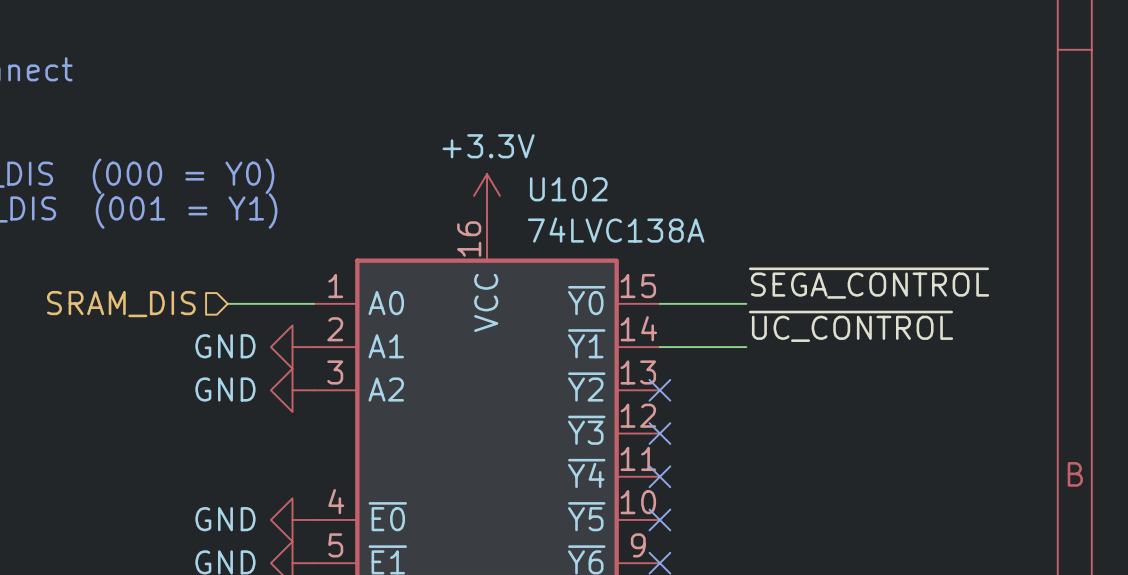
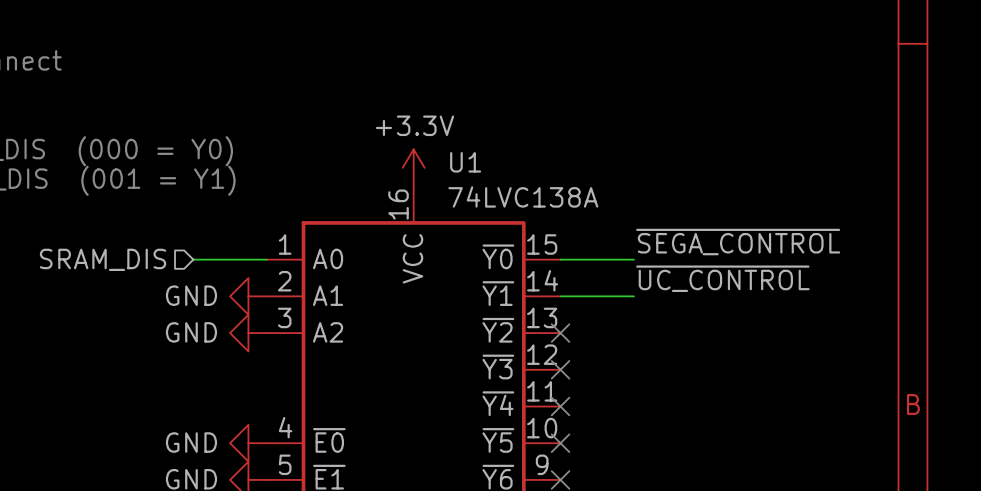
U102 name: U102 (568, 189) -> U1 (465, 162)

